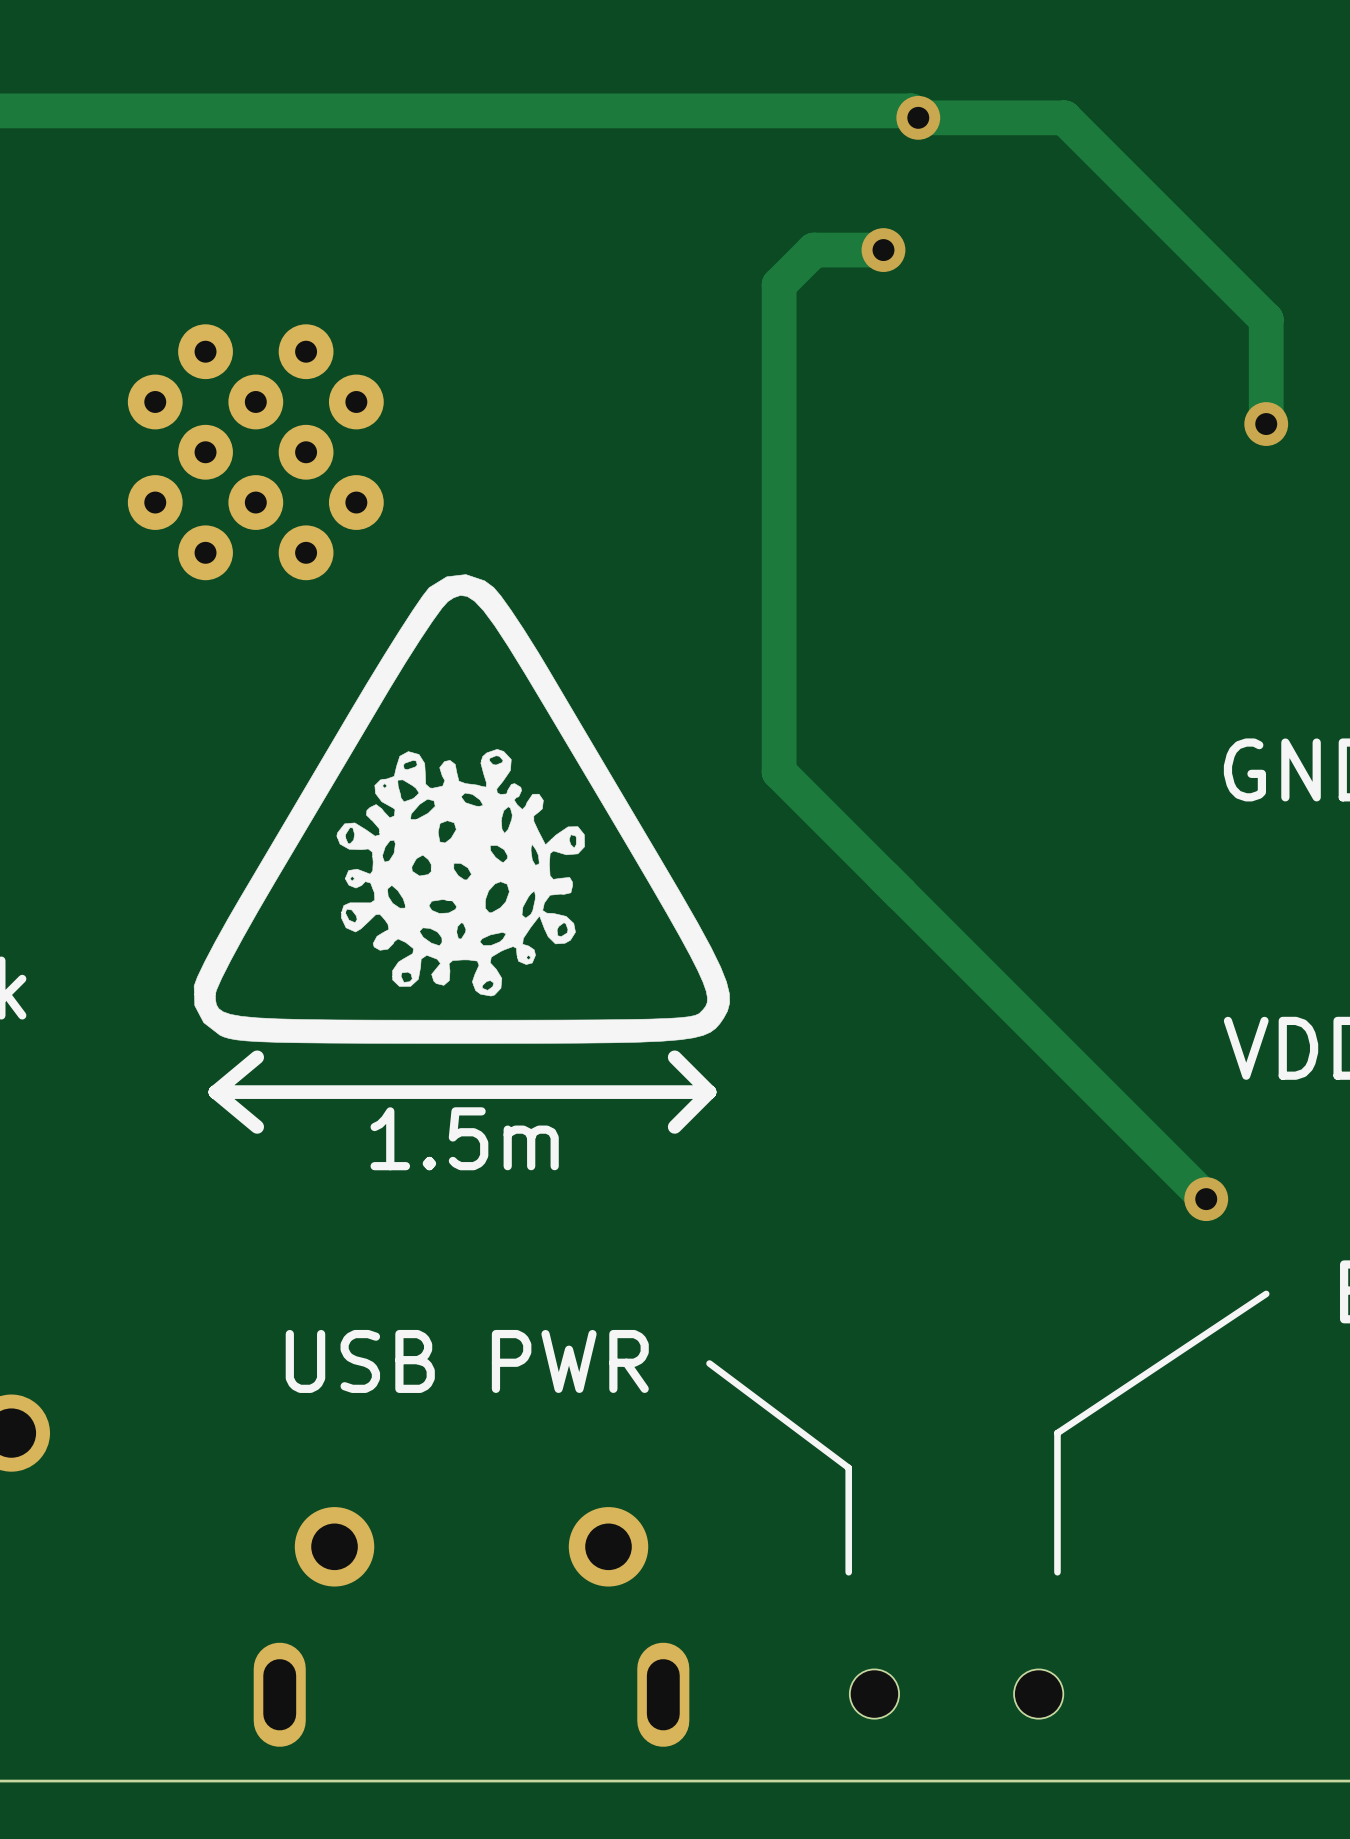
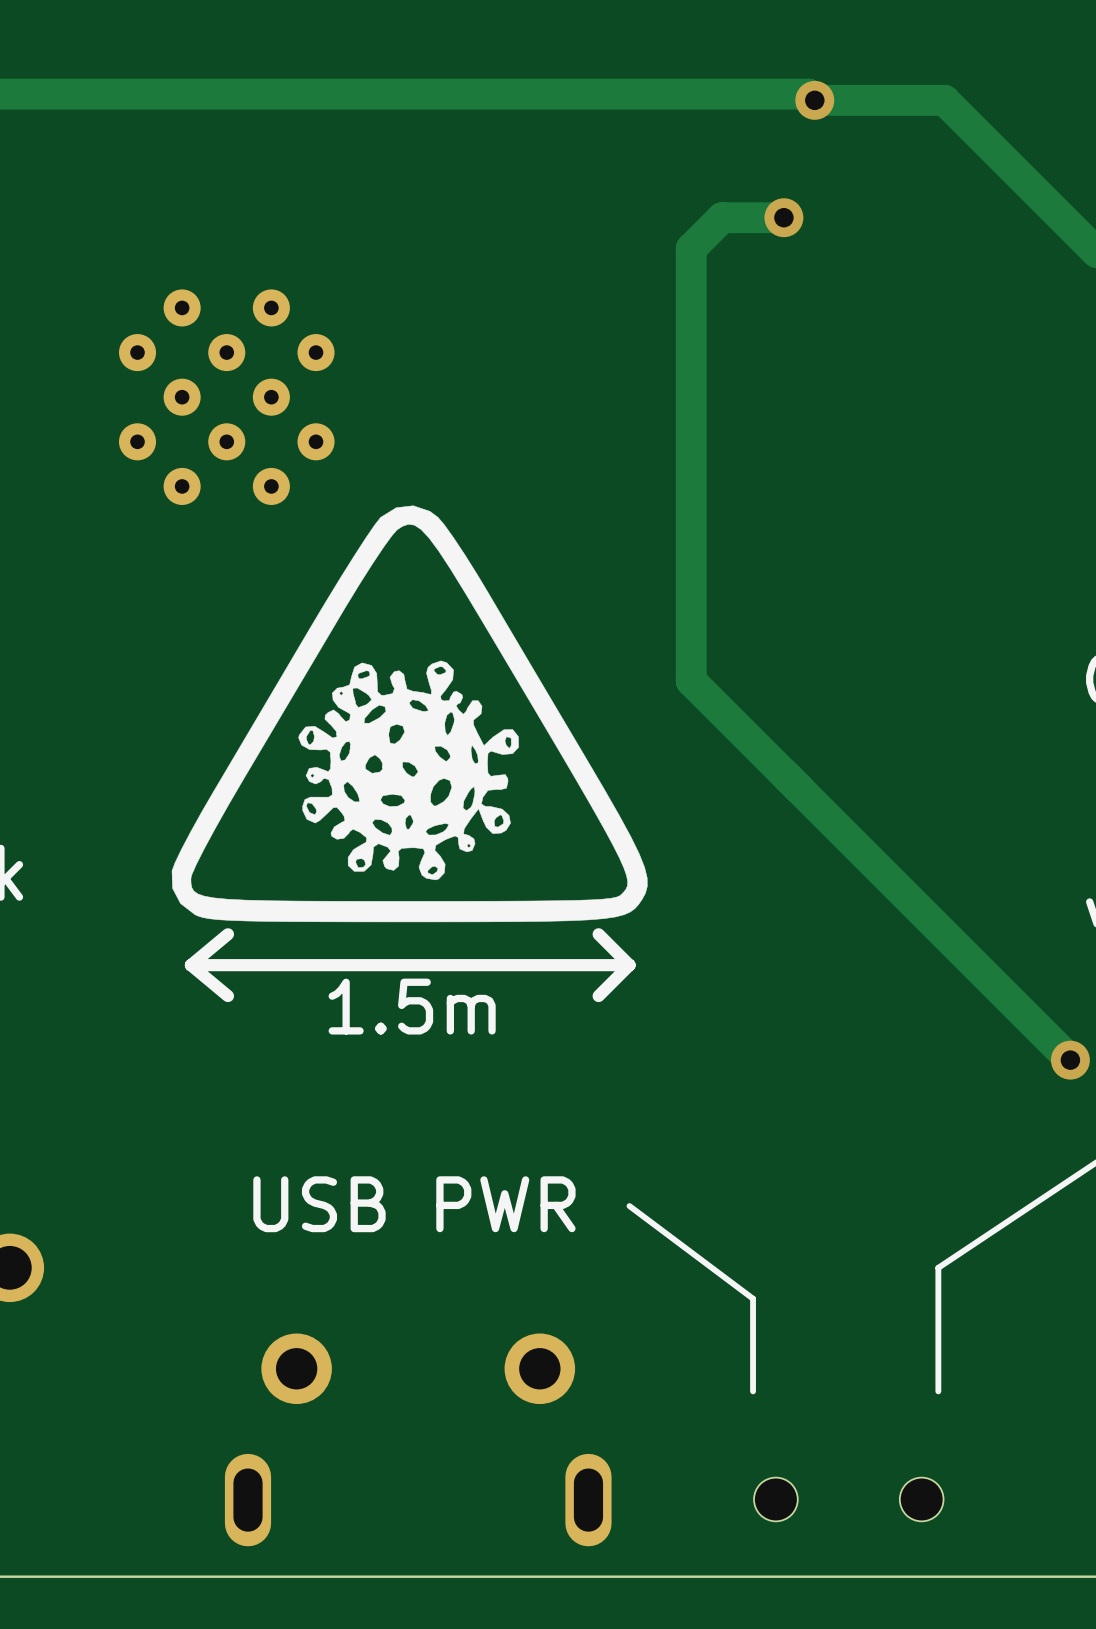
part footprint: [127, 324, 384, 581] -> [118, 289, 335, 505]

